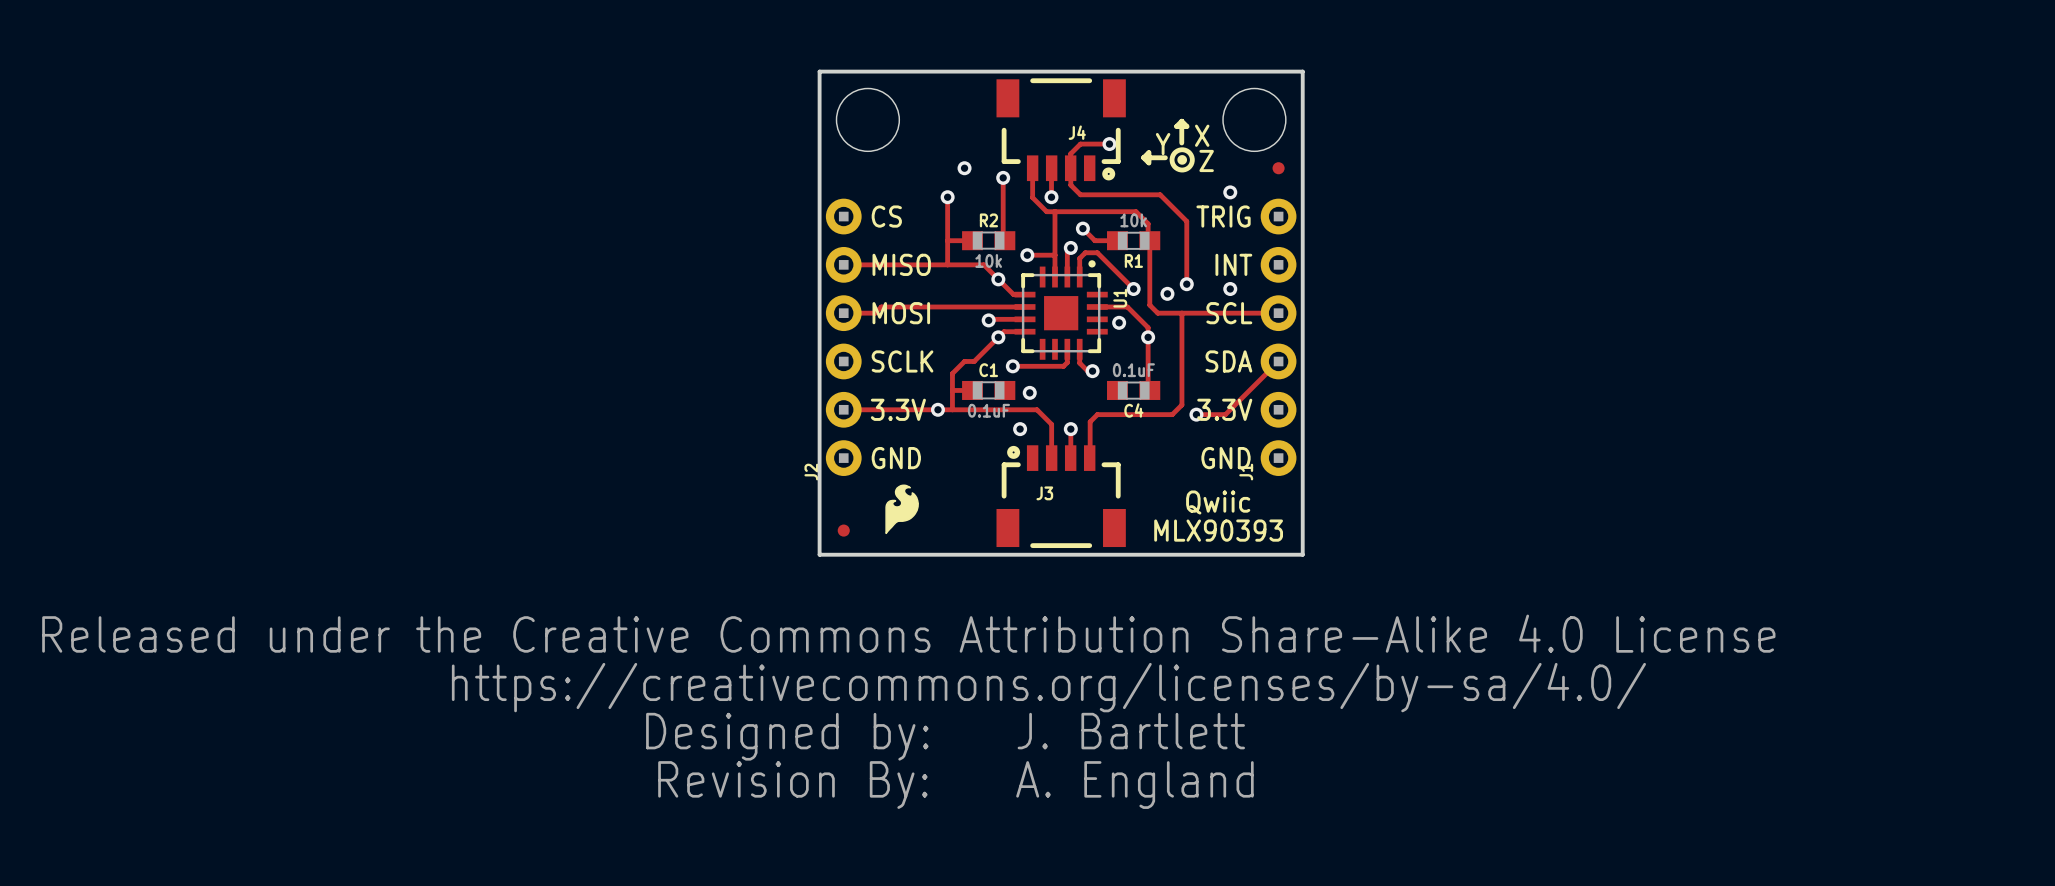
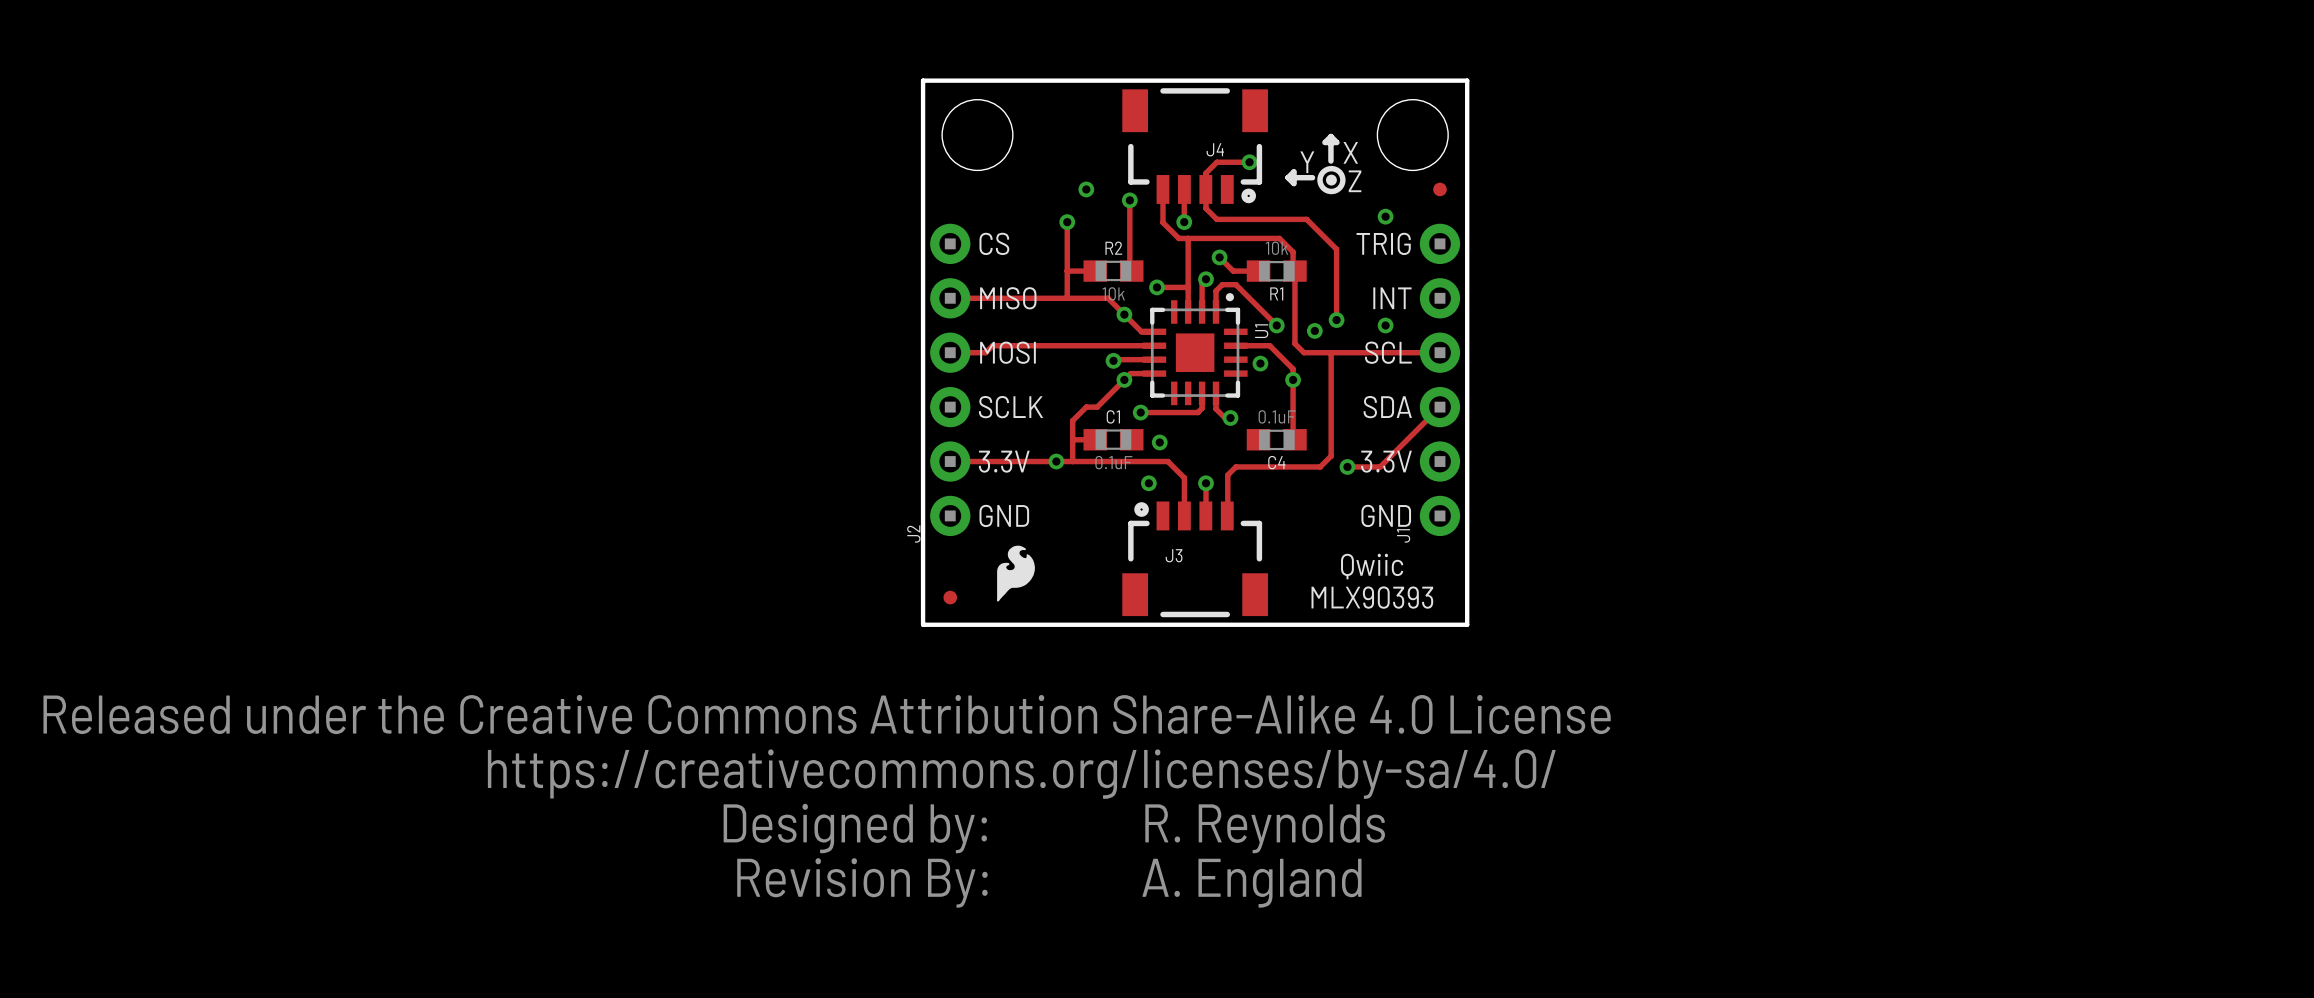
text: J. Bartlett (1131, 731) -> R. Reynolds (1265, 828)

